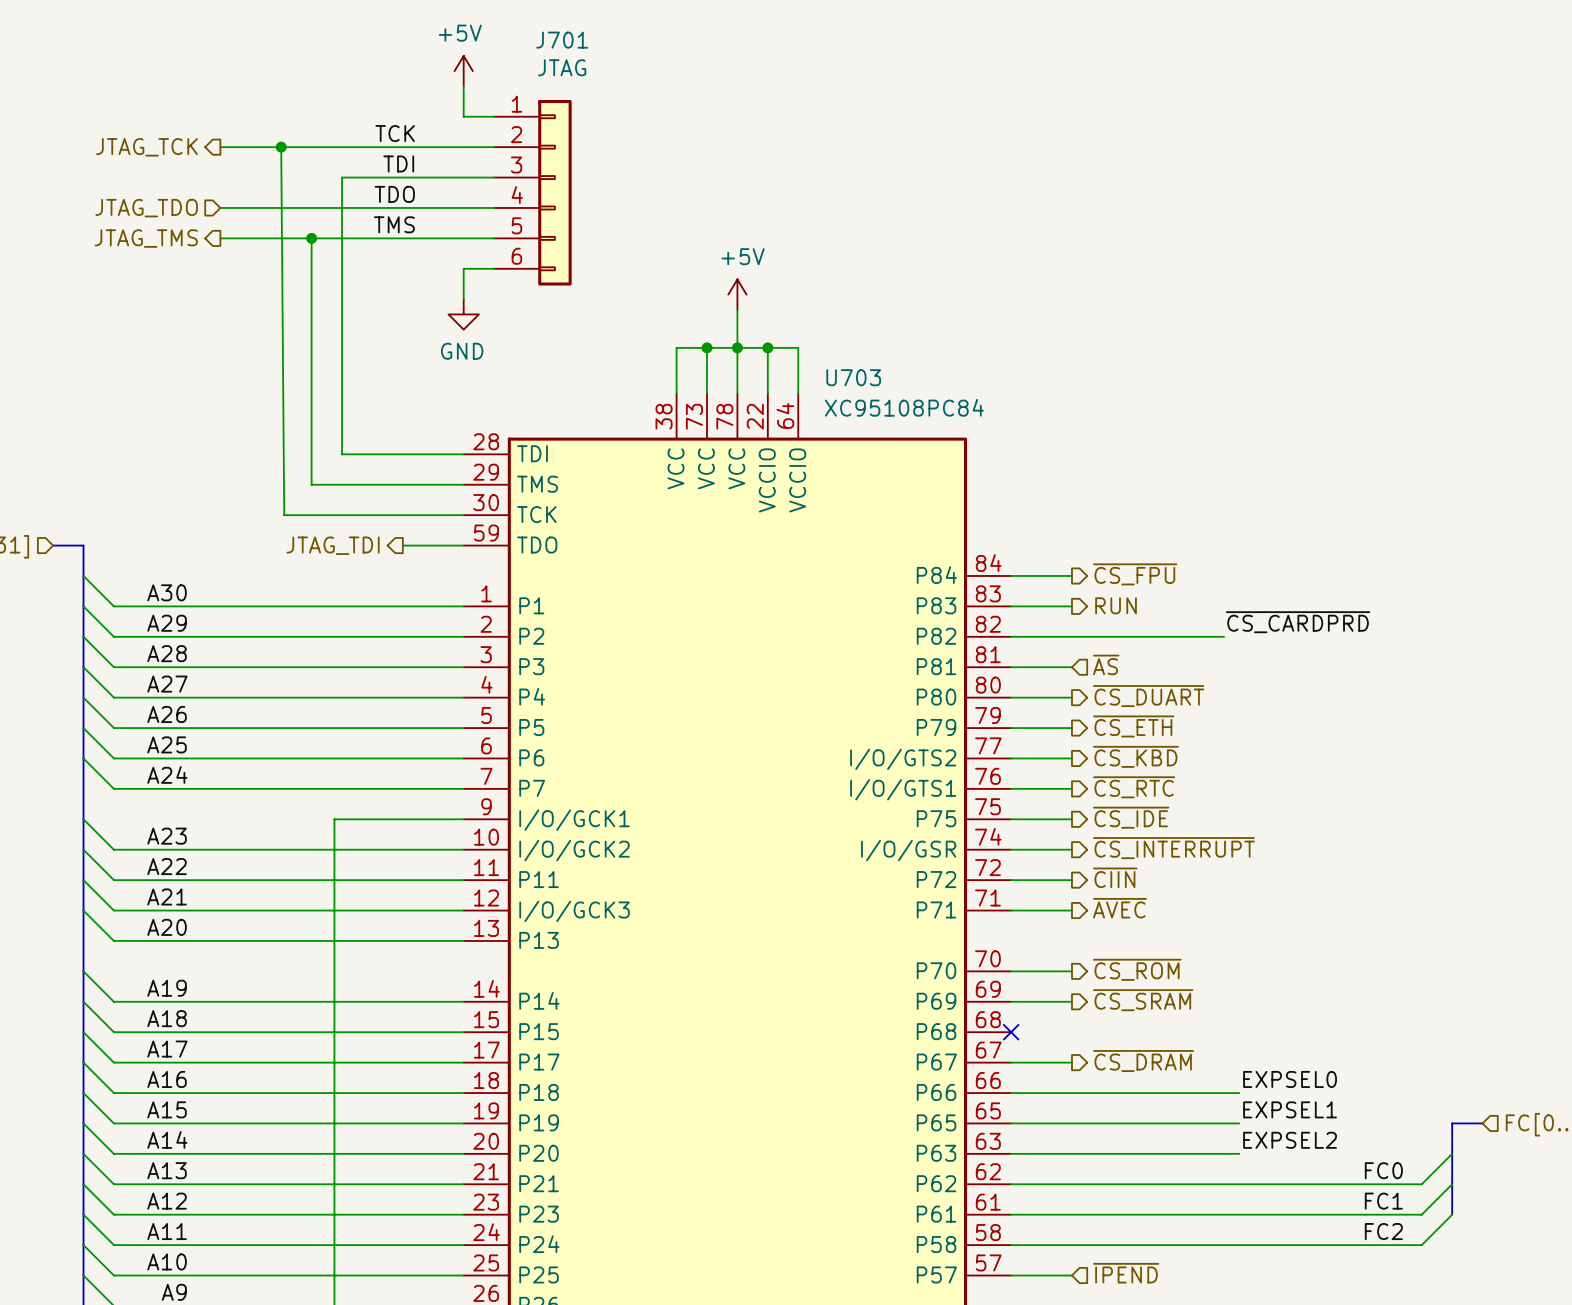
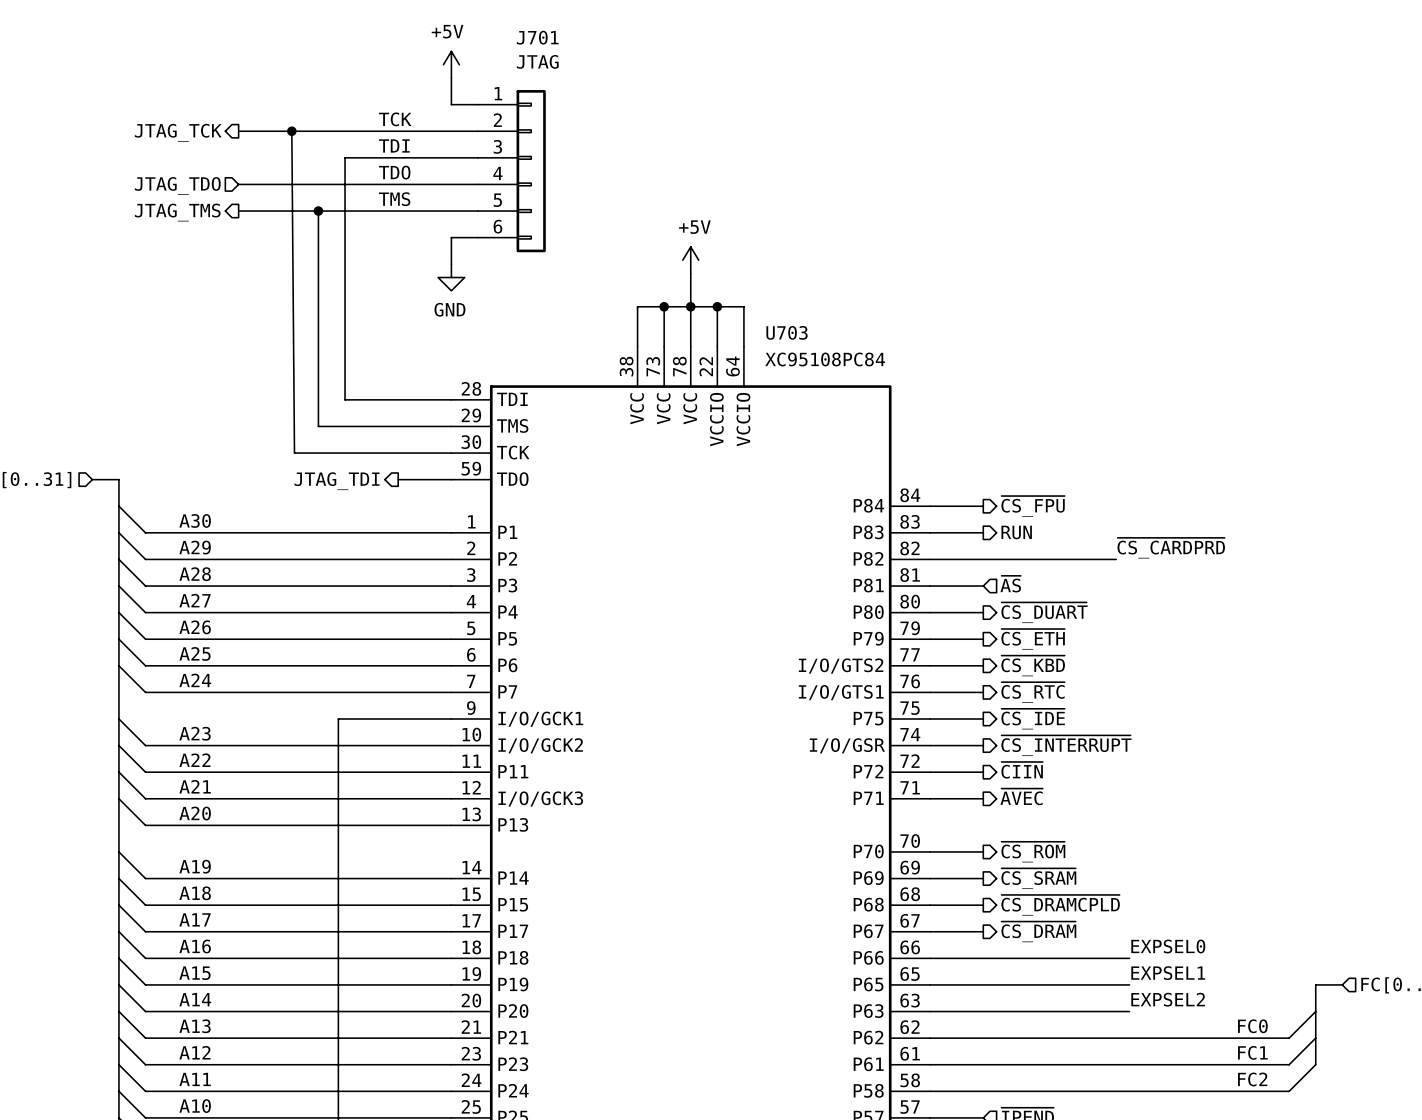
hierarchical label: none -> ~{CS_DRAMCPLD} (1060, 905)
wire: none -> (930, 905) (983, 905)
no-connect mark: (1011, 1032) -> none

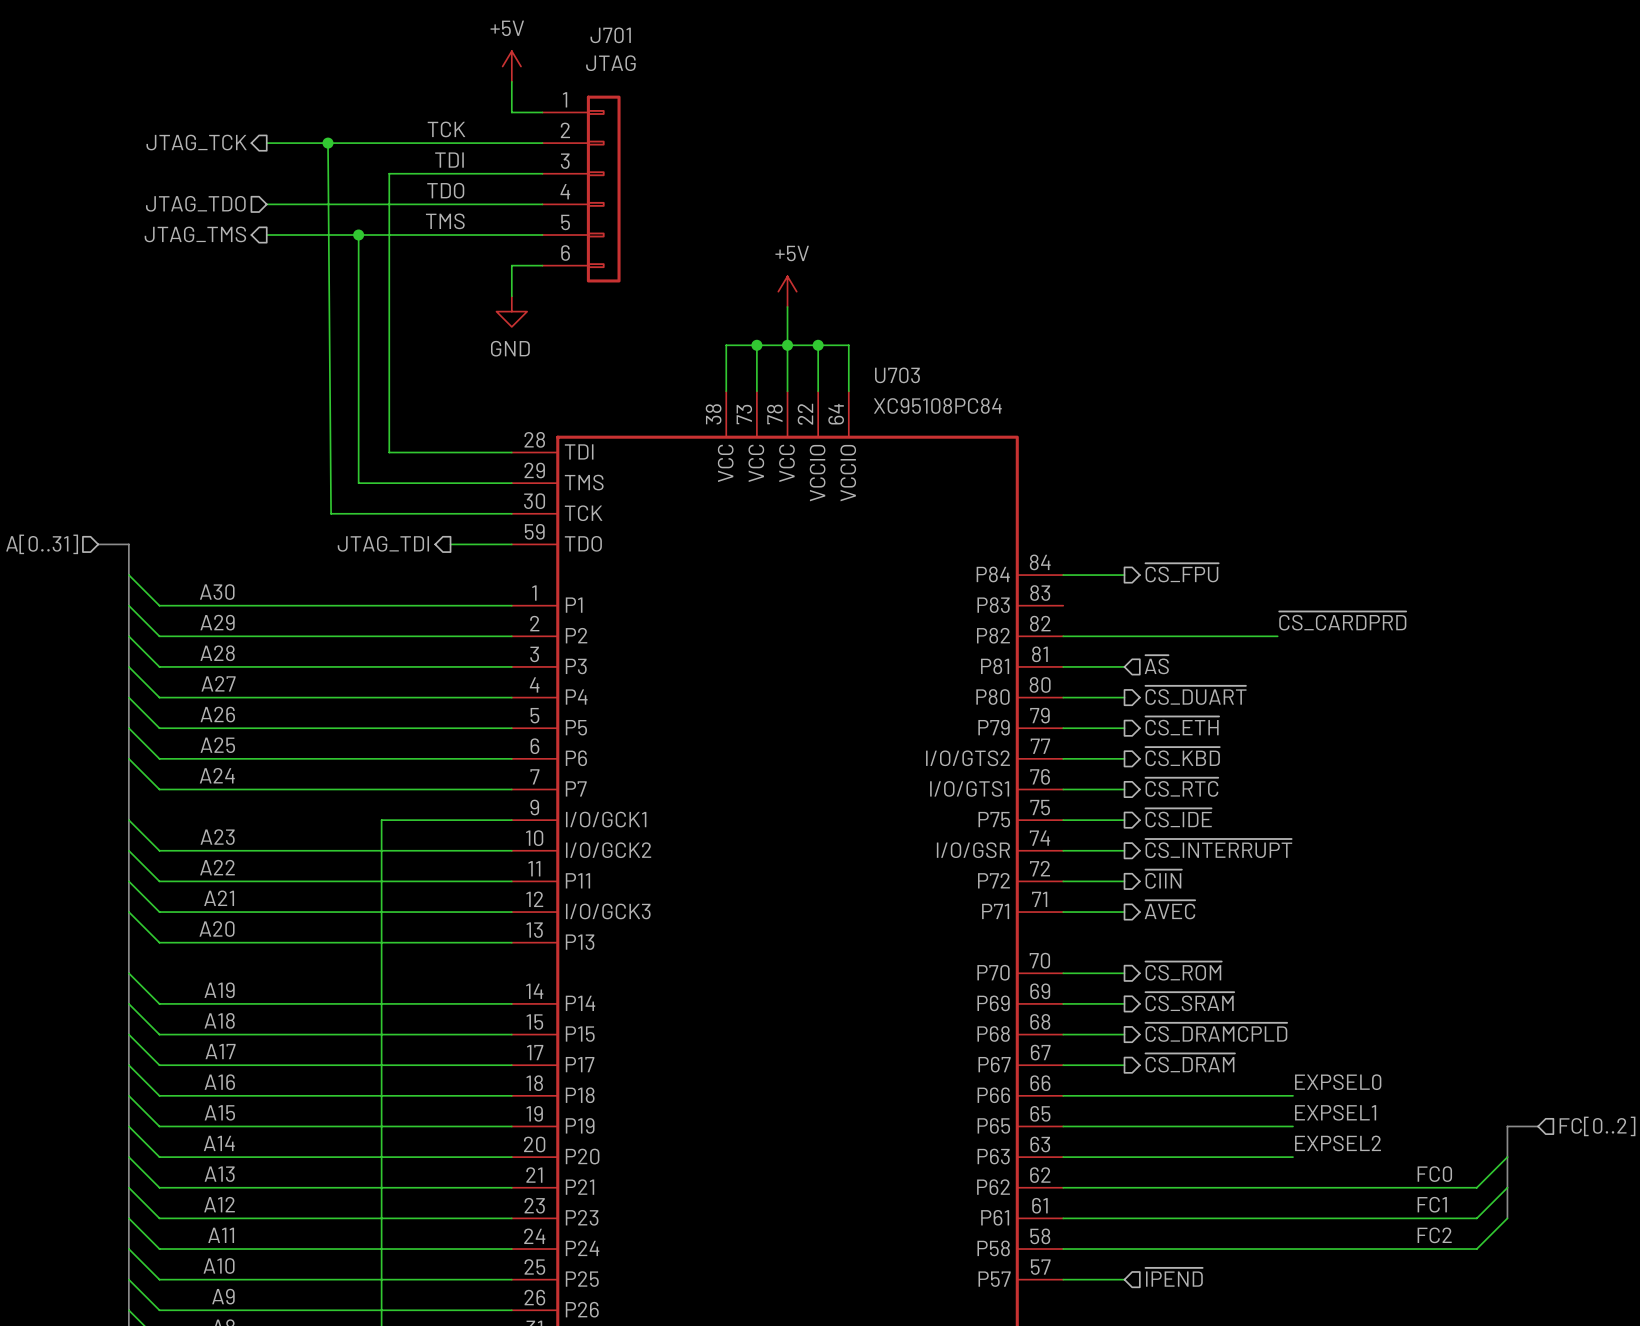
wire: (930, 532) (983, 532) -> none
hierarchical label: RUN (1016, 532) -> none

